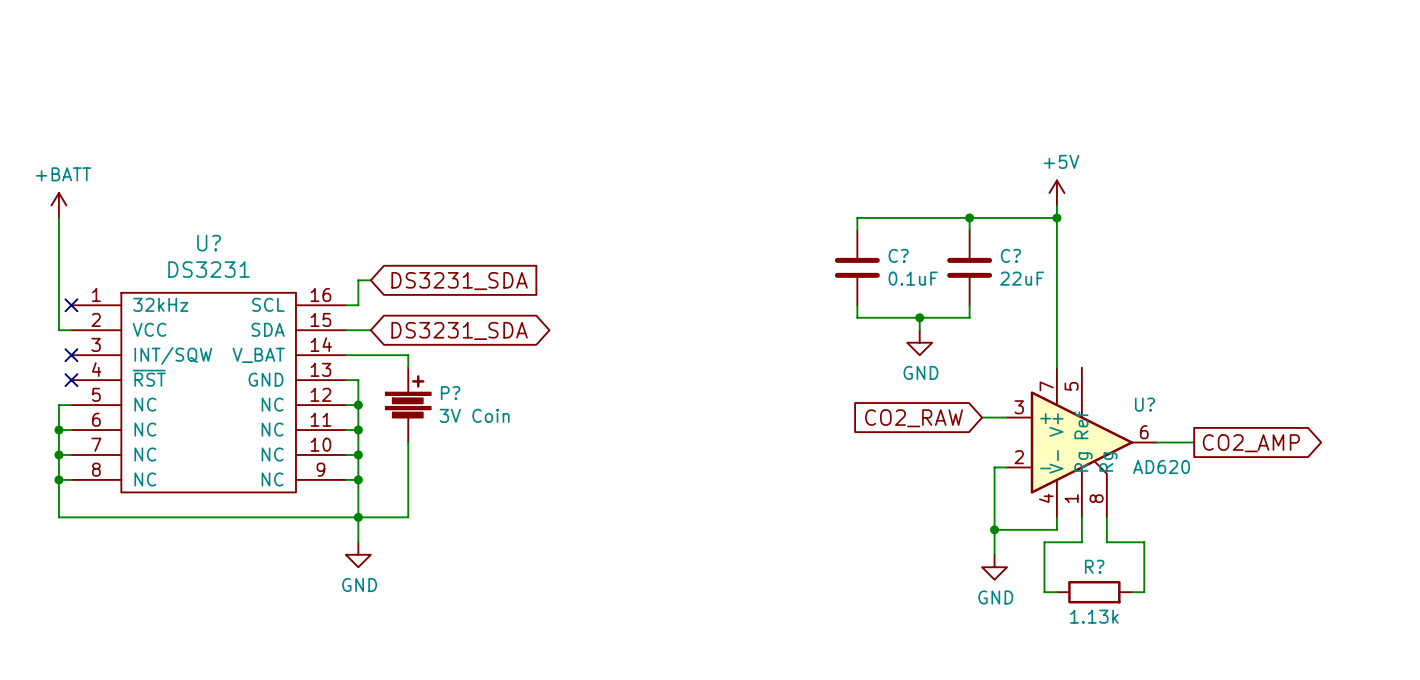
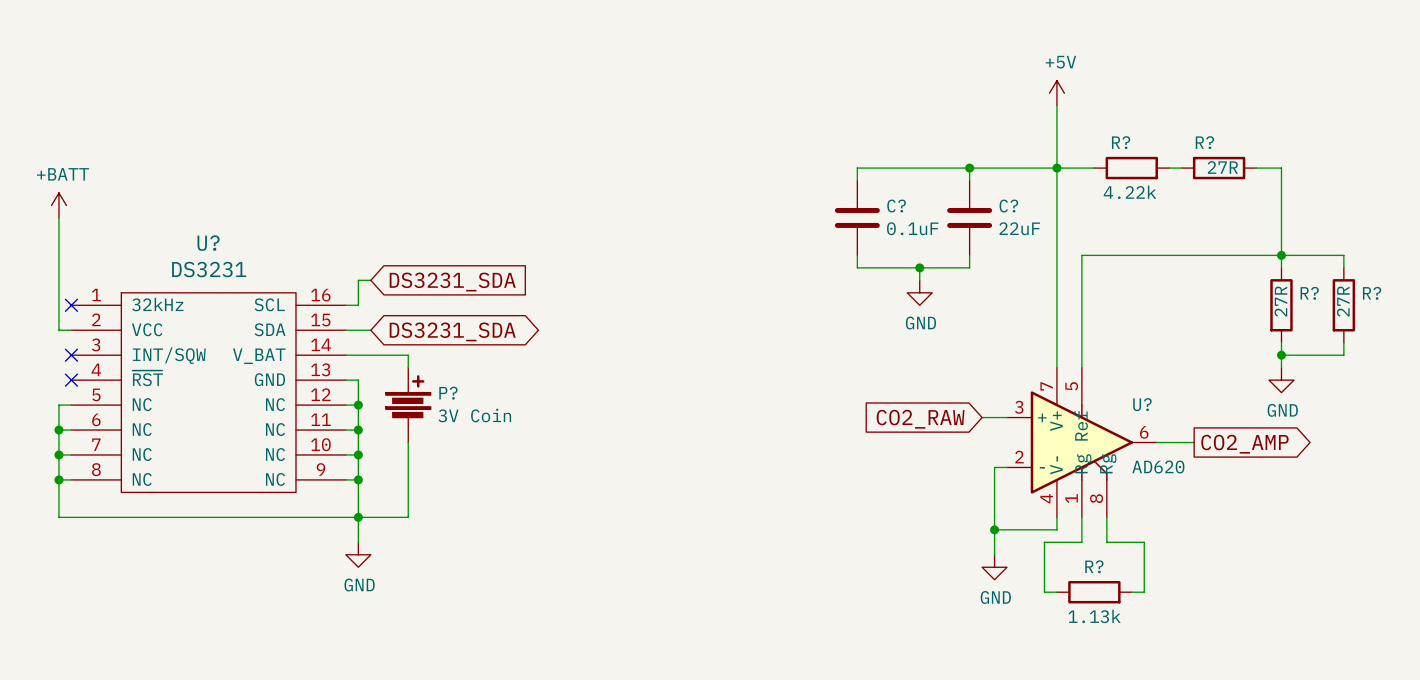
wire: none -> (1056, 105) (1056, 205)
junction: none -> (969, 168)
wire: none -> (1094, 168) (857, 168) (857, 180)
R?: none -> 4.22k (1131, 168)
wire: none -> (1169, 168) (1181, 168)
R?: none -> 27R (1219, 168)
wire: none -> (1256, 168) (1281, 168) (1281, 267)
power symbol position: +5V (1056, 193) -> +5V (1056, 93)
junction: (969, 217) -> none
wire: (1056, 217) (857, 217) (857, 230) -> none
junction position: (1056, 217) -> (1056, 168)
junction: none -> (1281, 255)
C? position: (857, 267) -> (857, 217)
junction: none -> (919, 267)
C? position: (969, 267) -> (969, 217)
wire: none -> (1343, 267) (1343, 255) (1081, 255) (1081, 367)
wire: (857, 305) (857, 317) (969, 317) (969, 305) -> (857, 255) (857, 267) (969, 267) (969, 255)
R?: none -> 27R (1281, 305)
R?: none -> 27R (1343, 305)
wire: (919, 317) (919, 330) -> (919, 267) (919, 280)
junction: (919, 317) -> none
power symbol position: GND (919, 342) -> GND (919, 292)
wire: none -> (1281, 342) (1281, 367)
wire: none -> (1343, 342) (1343, 355) (1281, 355)
junction: none -> (1281, 355)
power symbol: none -> GND (1281, 380)

